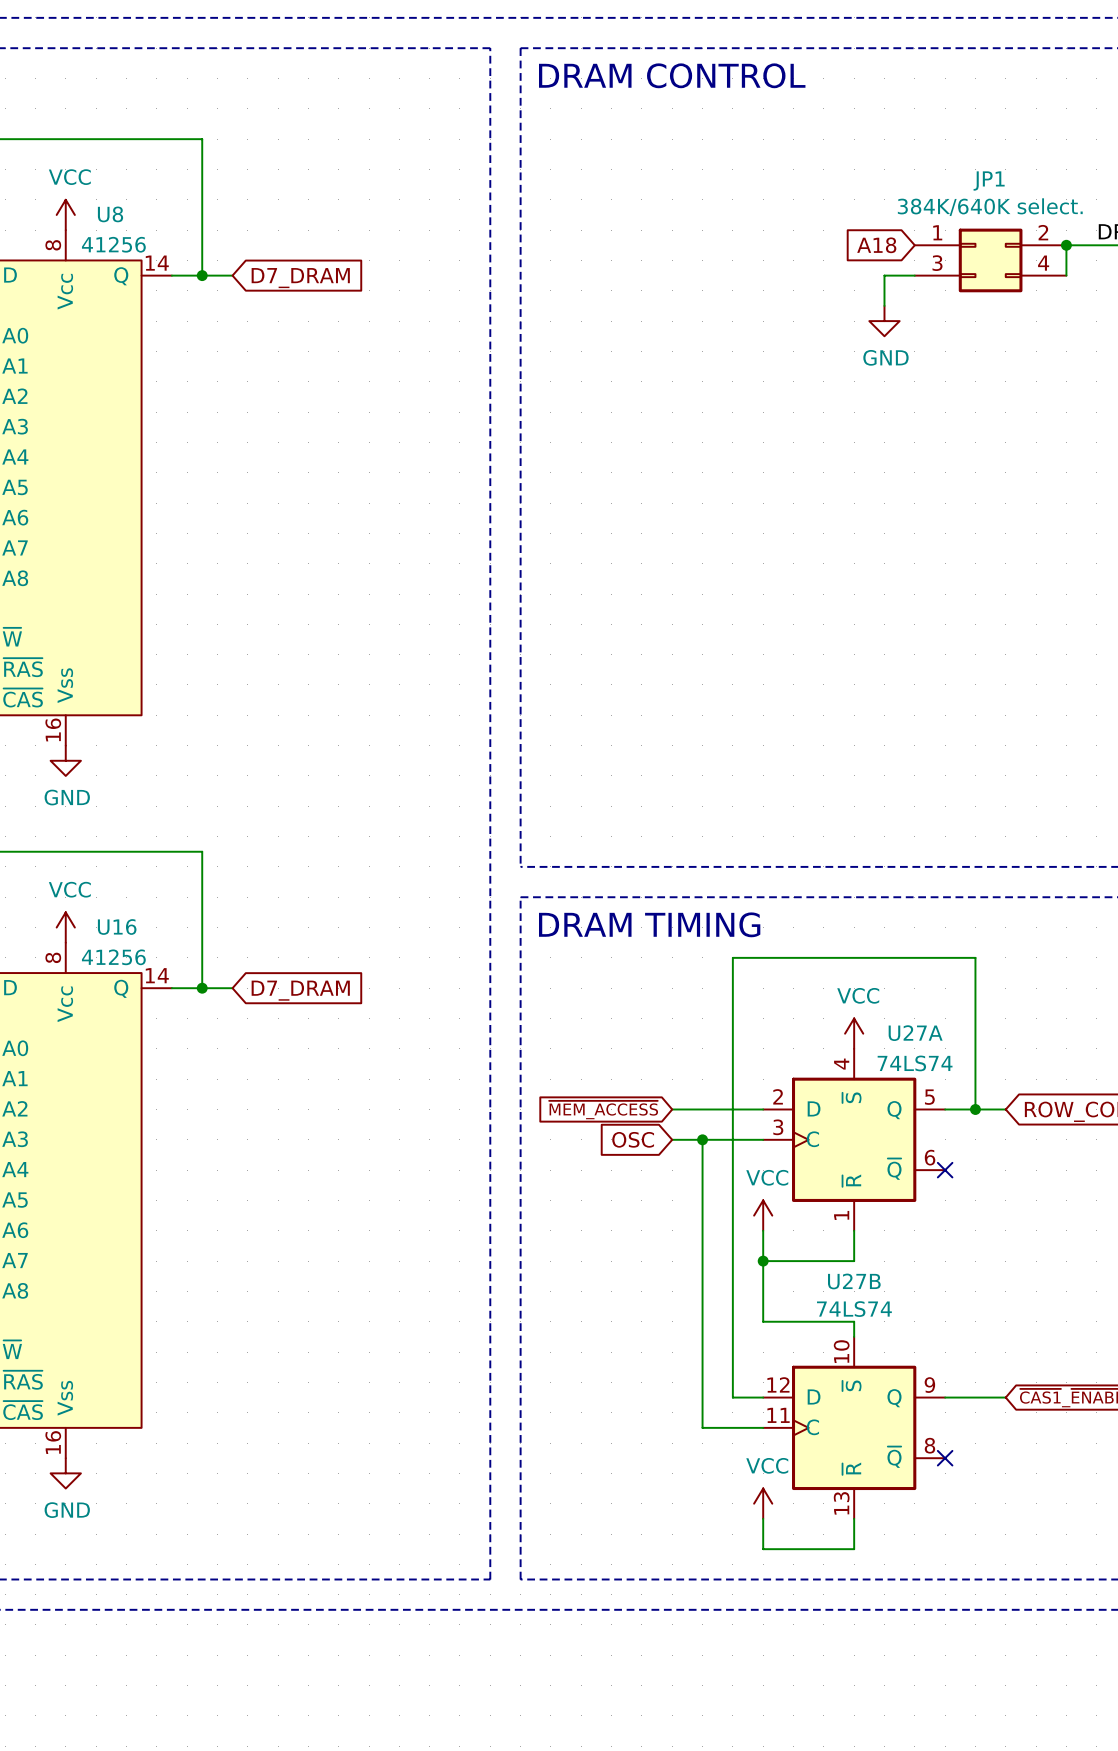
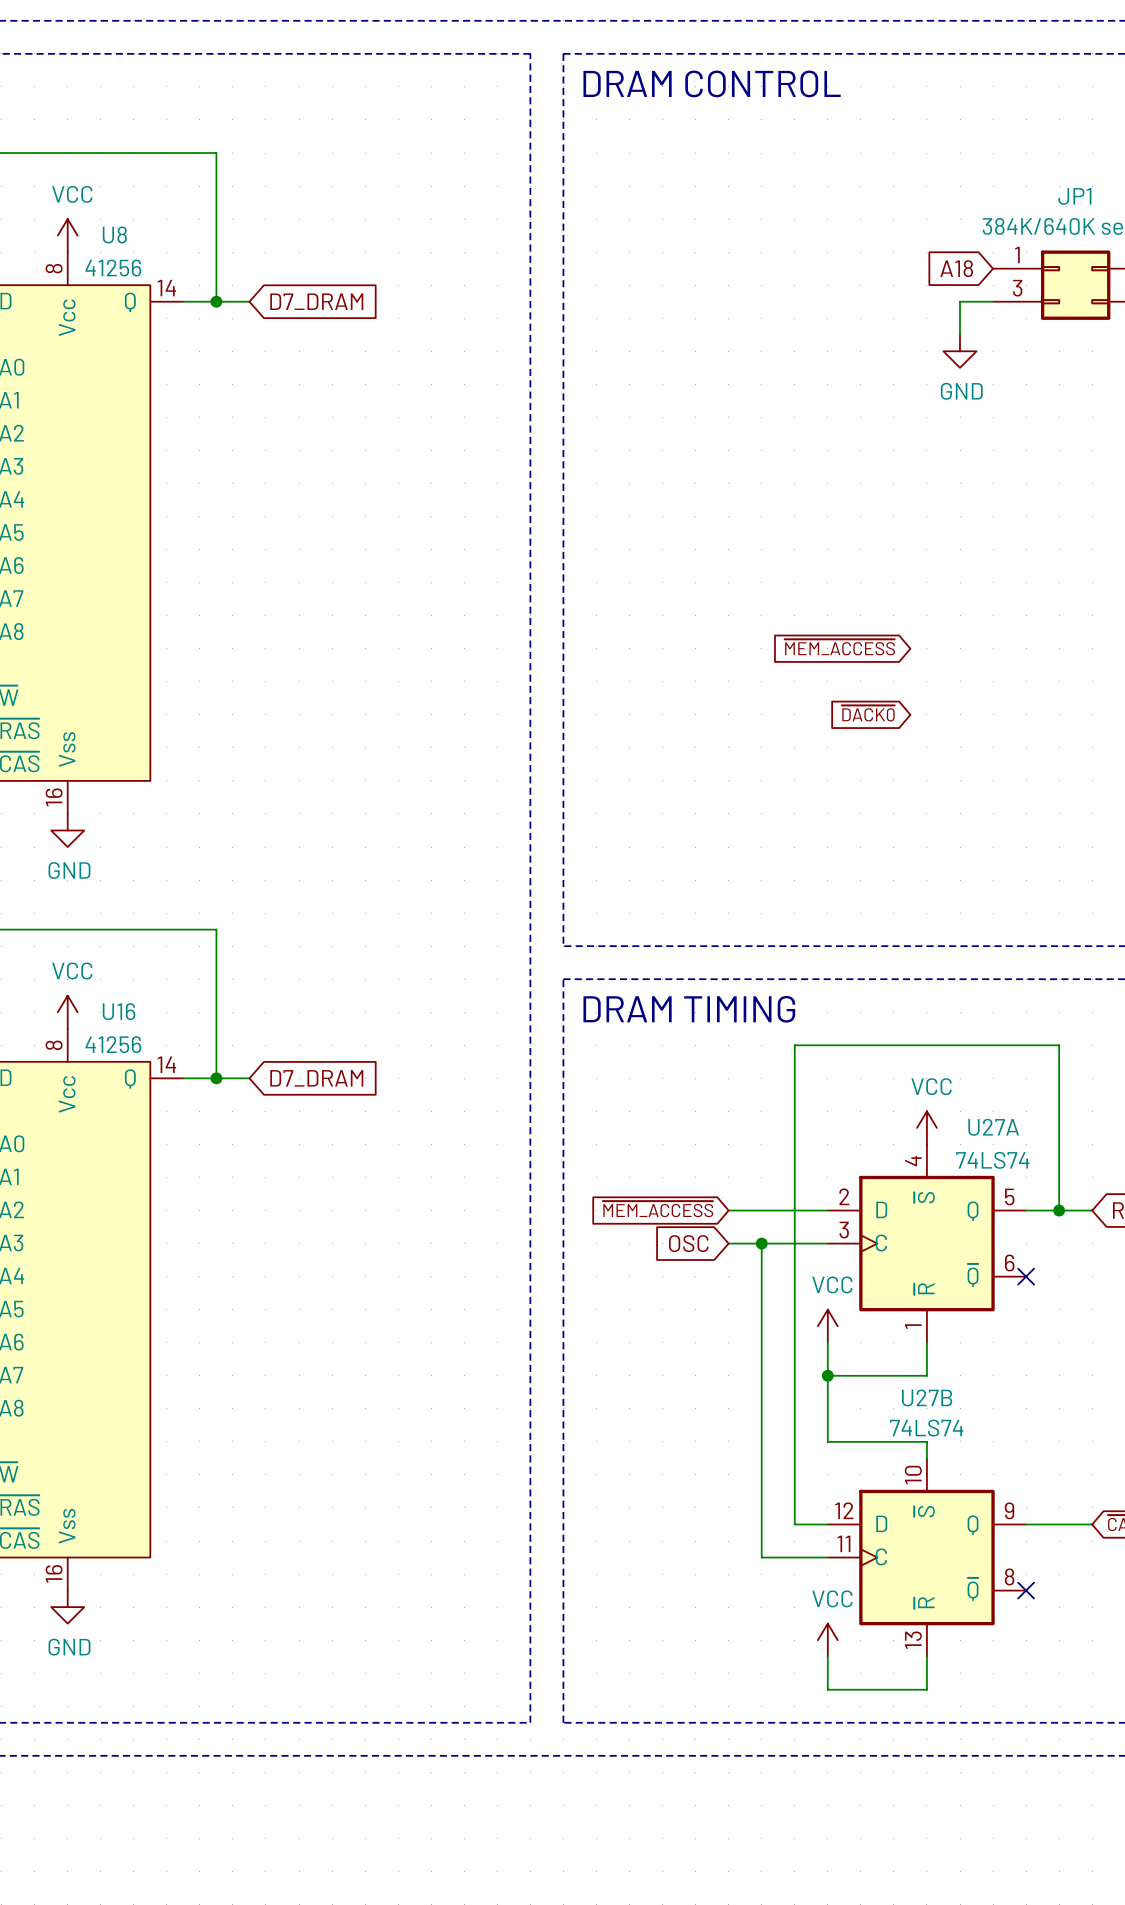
global label: none -> ~{MEM_ACCESS} (839, 647)
global label: none -> ~{DACK0} (868, 713)

